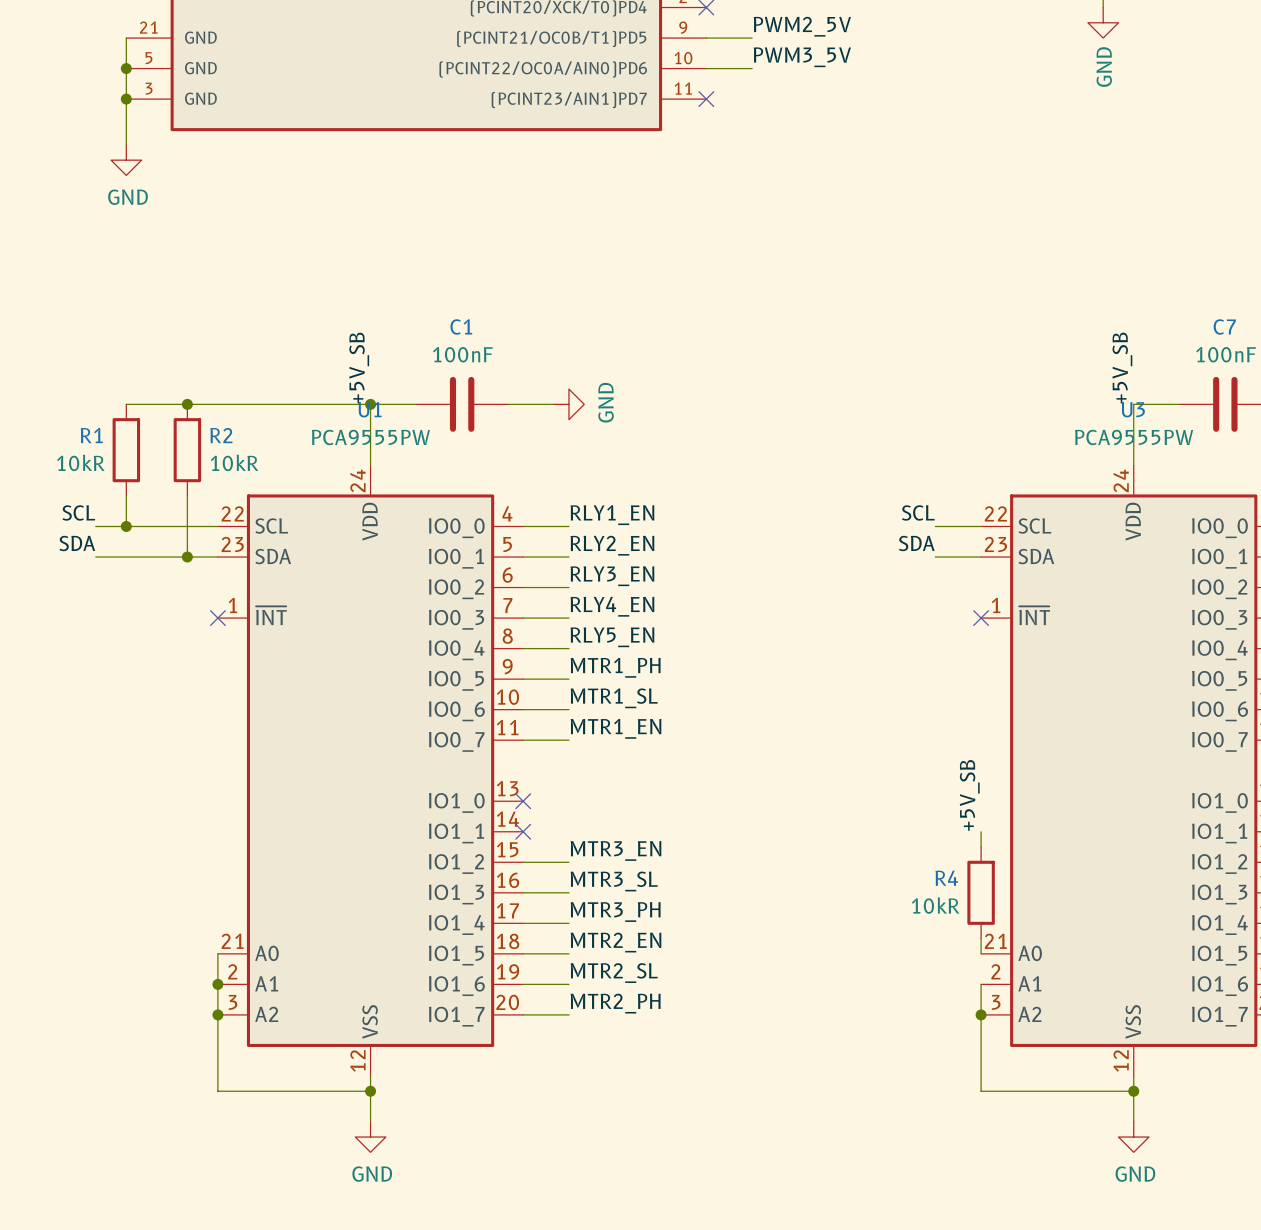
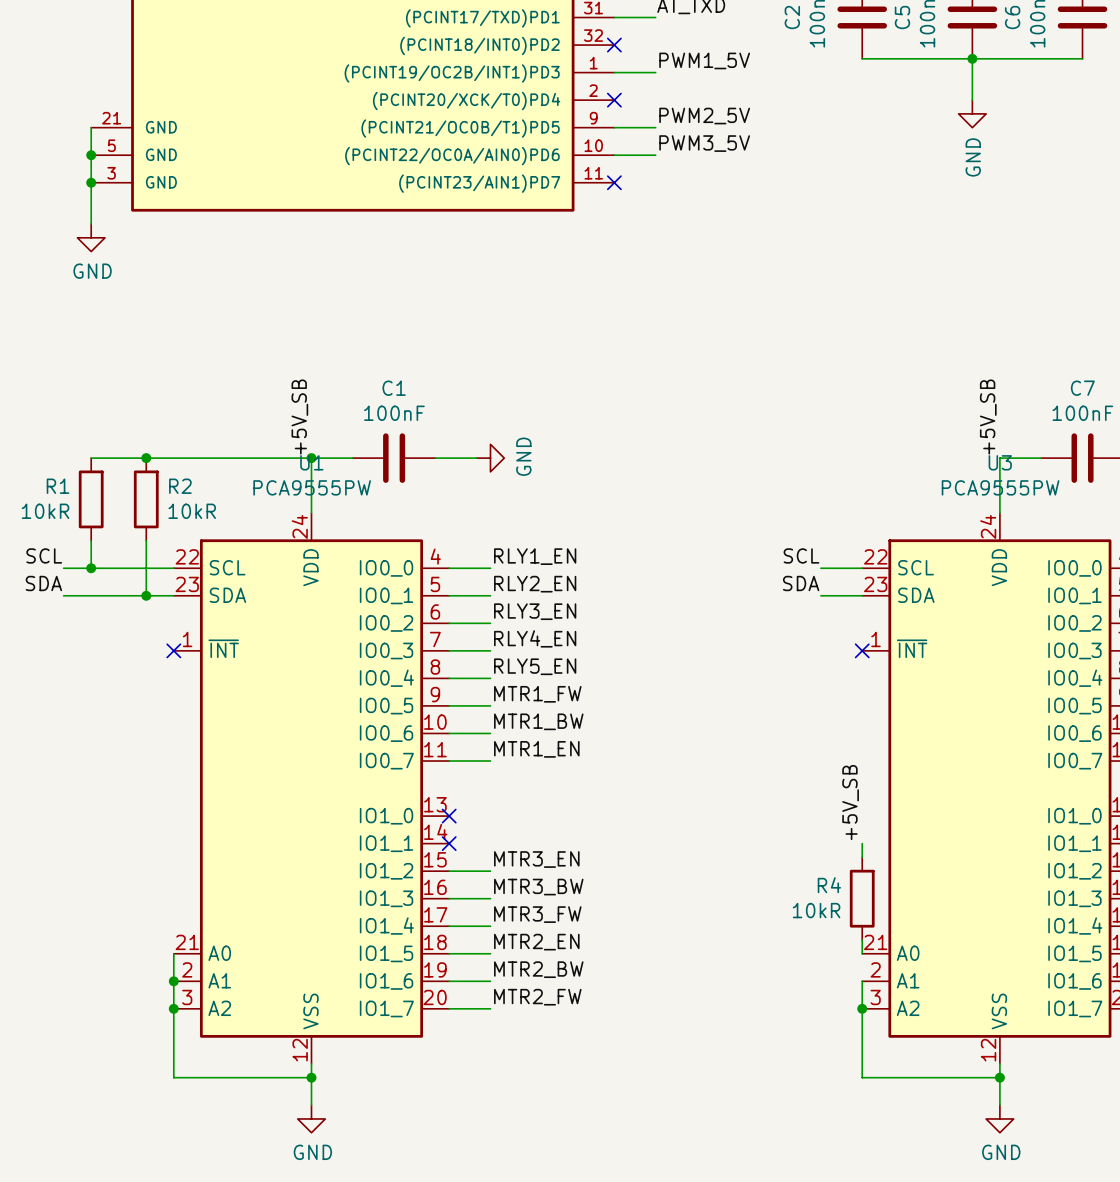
label: MTR1_PH (615, 667) -> MTR1_FW (537, 694)
label: MTR1_SL (614, 698) -> MTR1_BW (538, 721)
label: MTR3_SL (614, 881) -> MTR3_BW (538, 887)
label: MTR3_PH (615, 912) -> MTR3_FW (537, 914)
label: MTR2_SL (614, 973) -> MTR2_BW (538, 969)
label: MTR2_PH (615, 1003) -> MTR2_FW (537, 997)

